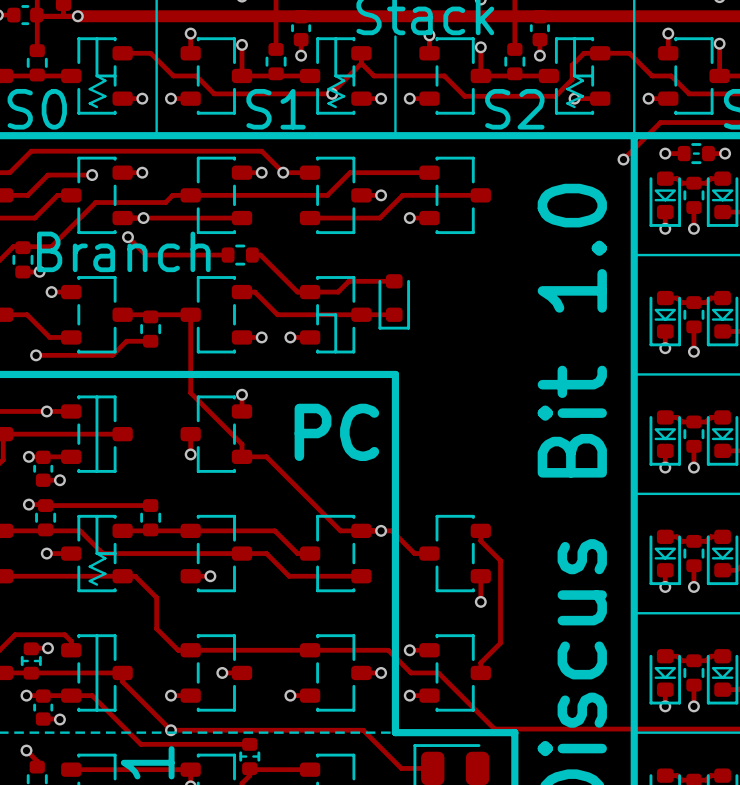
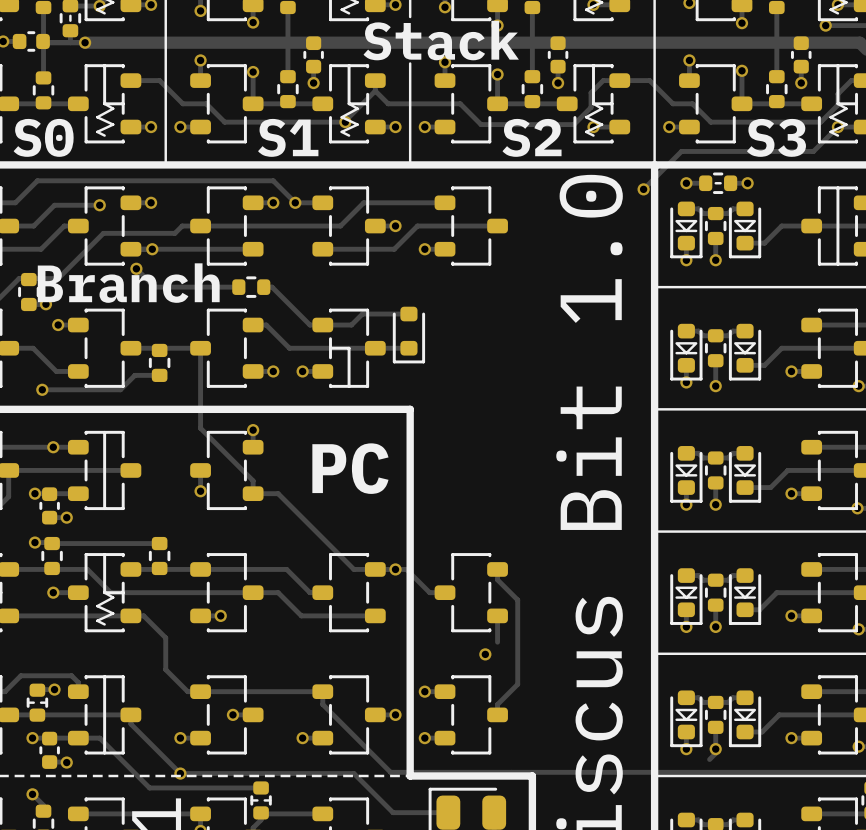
via position: (480, 601) -> (485, 654)
track: (310, 650) (388, 650) (410, 672) (438, 672) (494, 729) -> (322, 691) (322, 704) (390, 772) (511, 772)
track: none -> (715, 749) (715, 753) (709, 759)
track: (340, 730) (363, 730) (401, 768) -> (353, 773) (393, 812) (416, 812)

